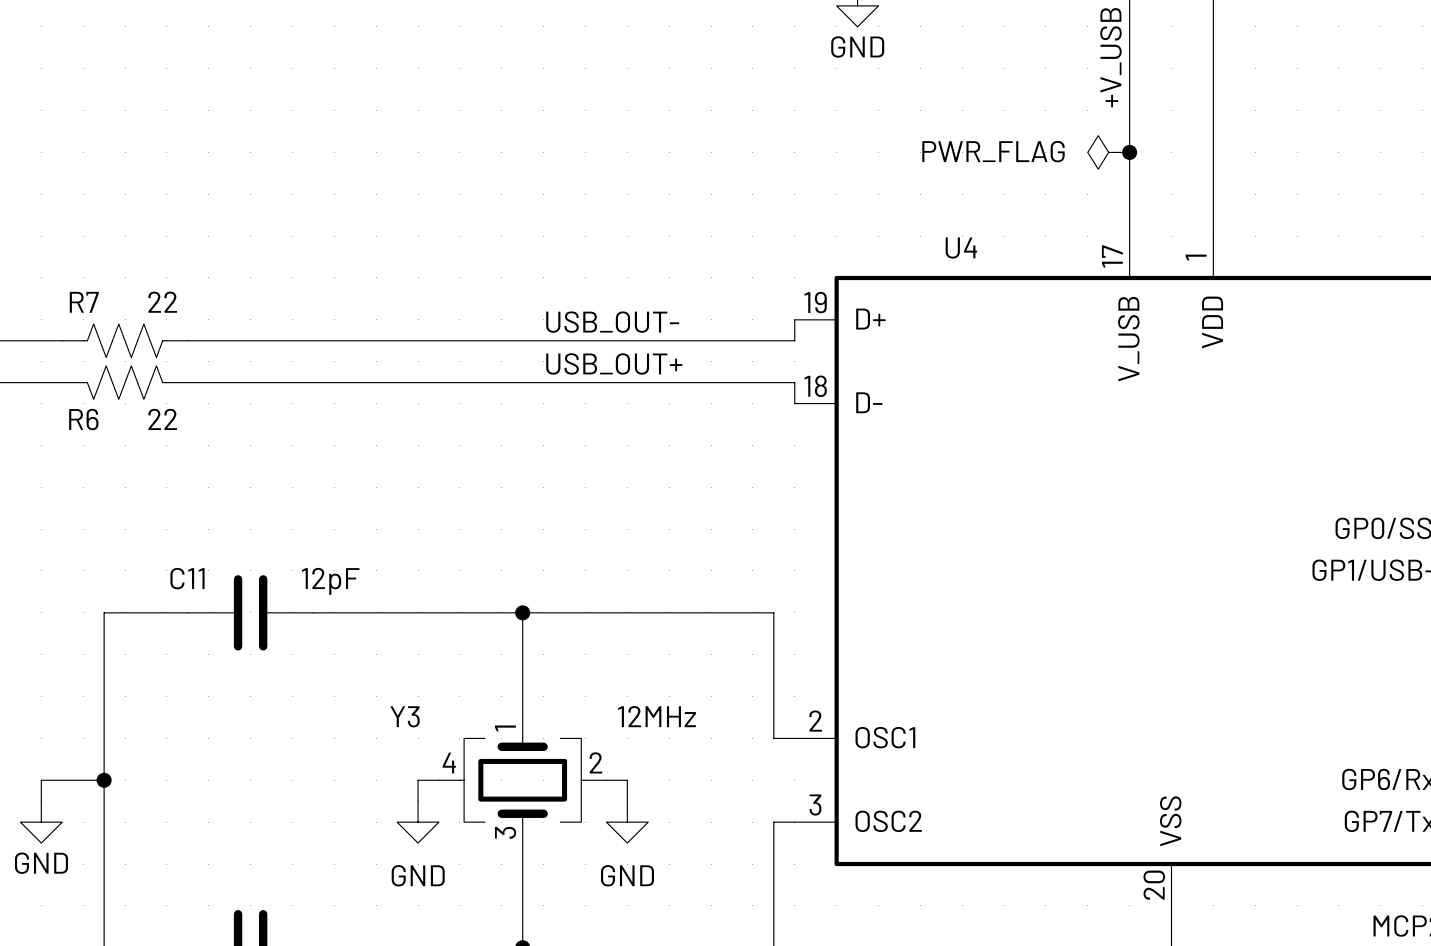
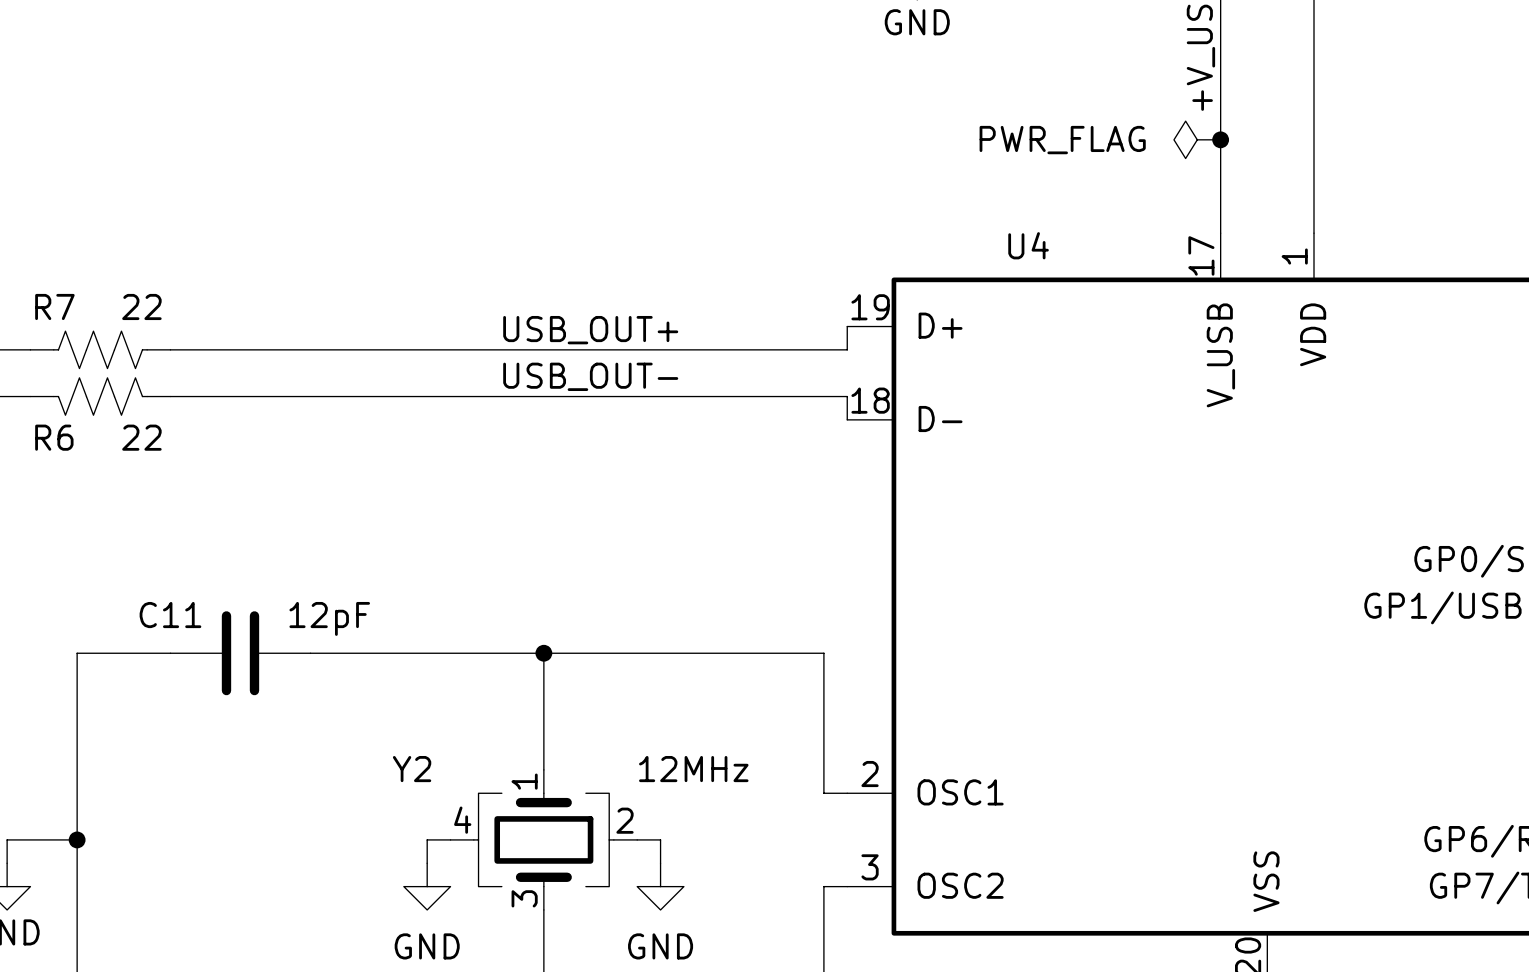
label position: USB_OUT- (612, 322) -> USB_OUT- (590, 376)
label position: USB_OUT+ (614, 363) -> USB_OUT+ (590, 330)
Y3 name: Y3 (405, 716) -> Y2 (412, 769)

